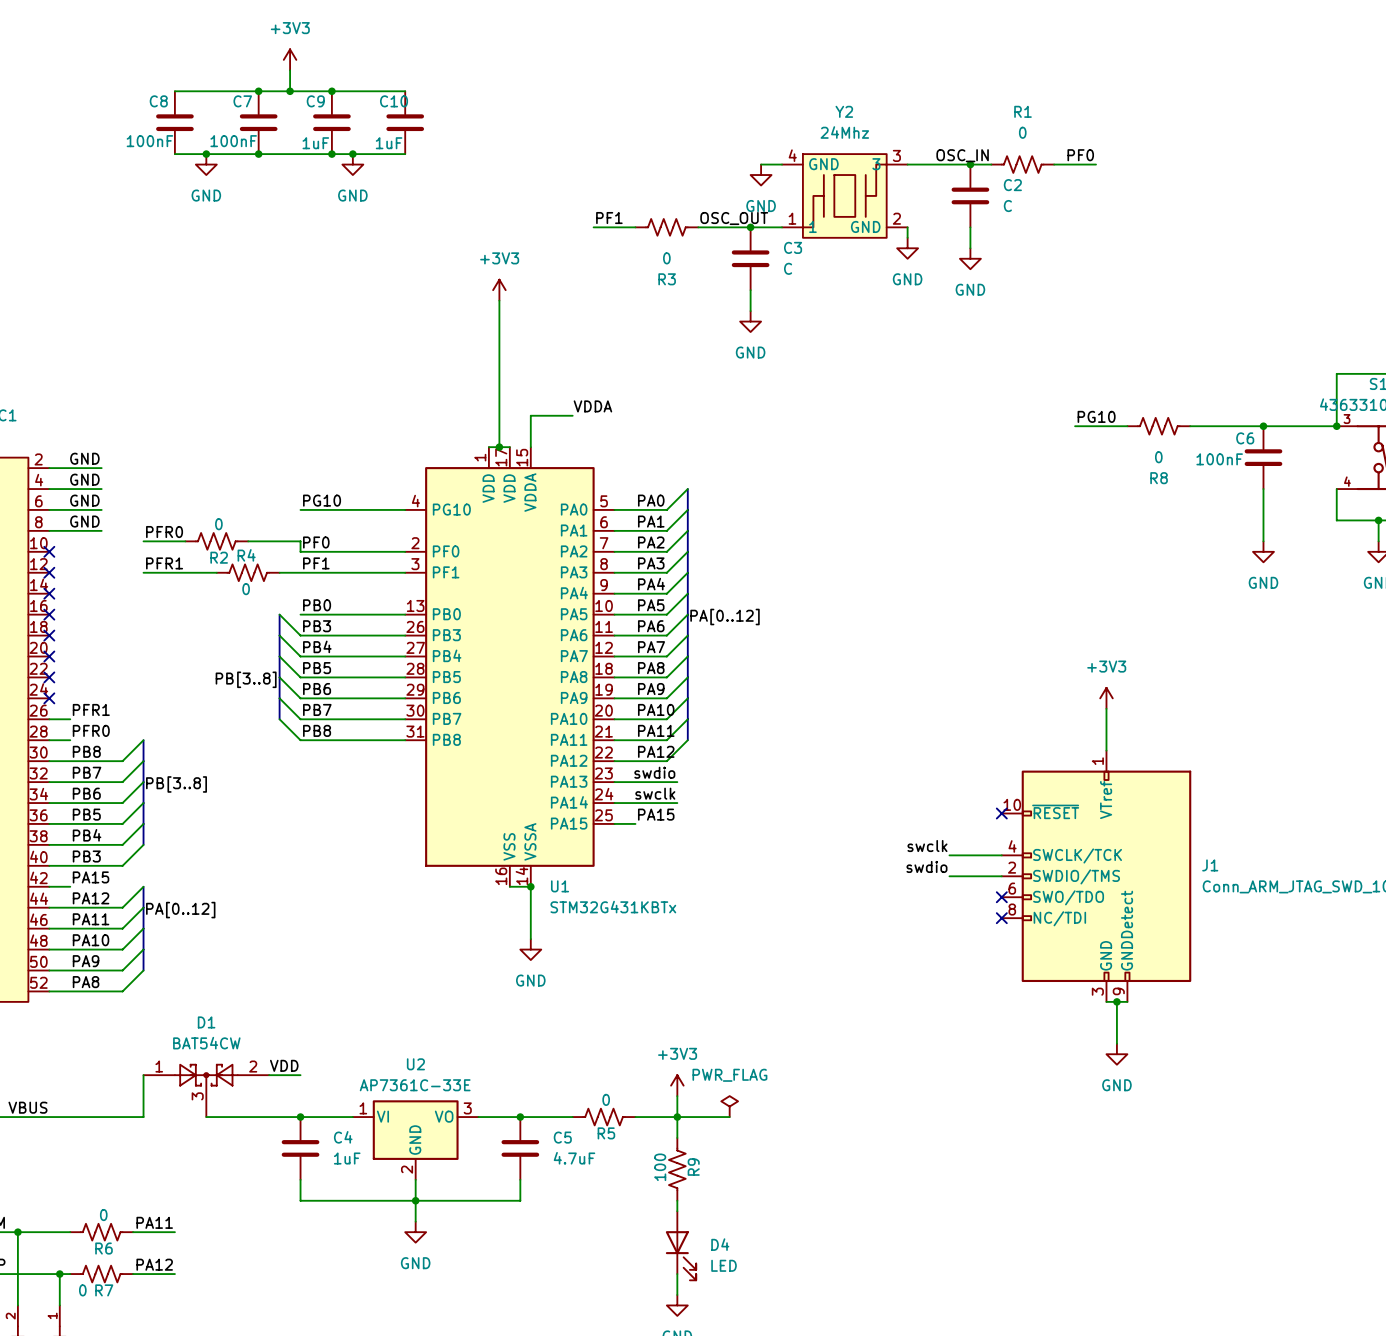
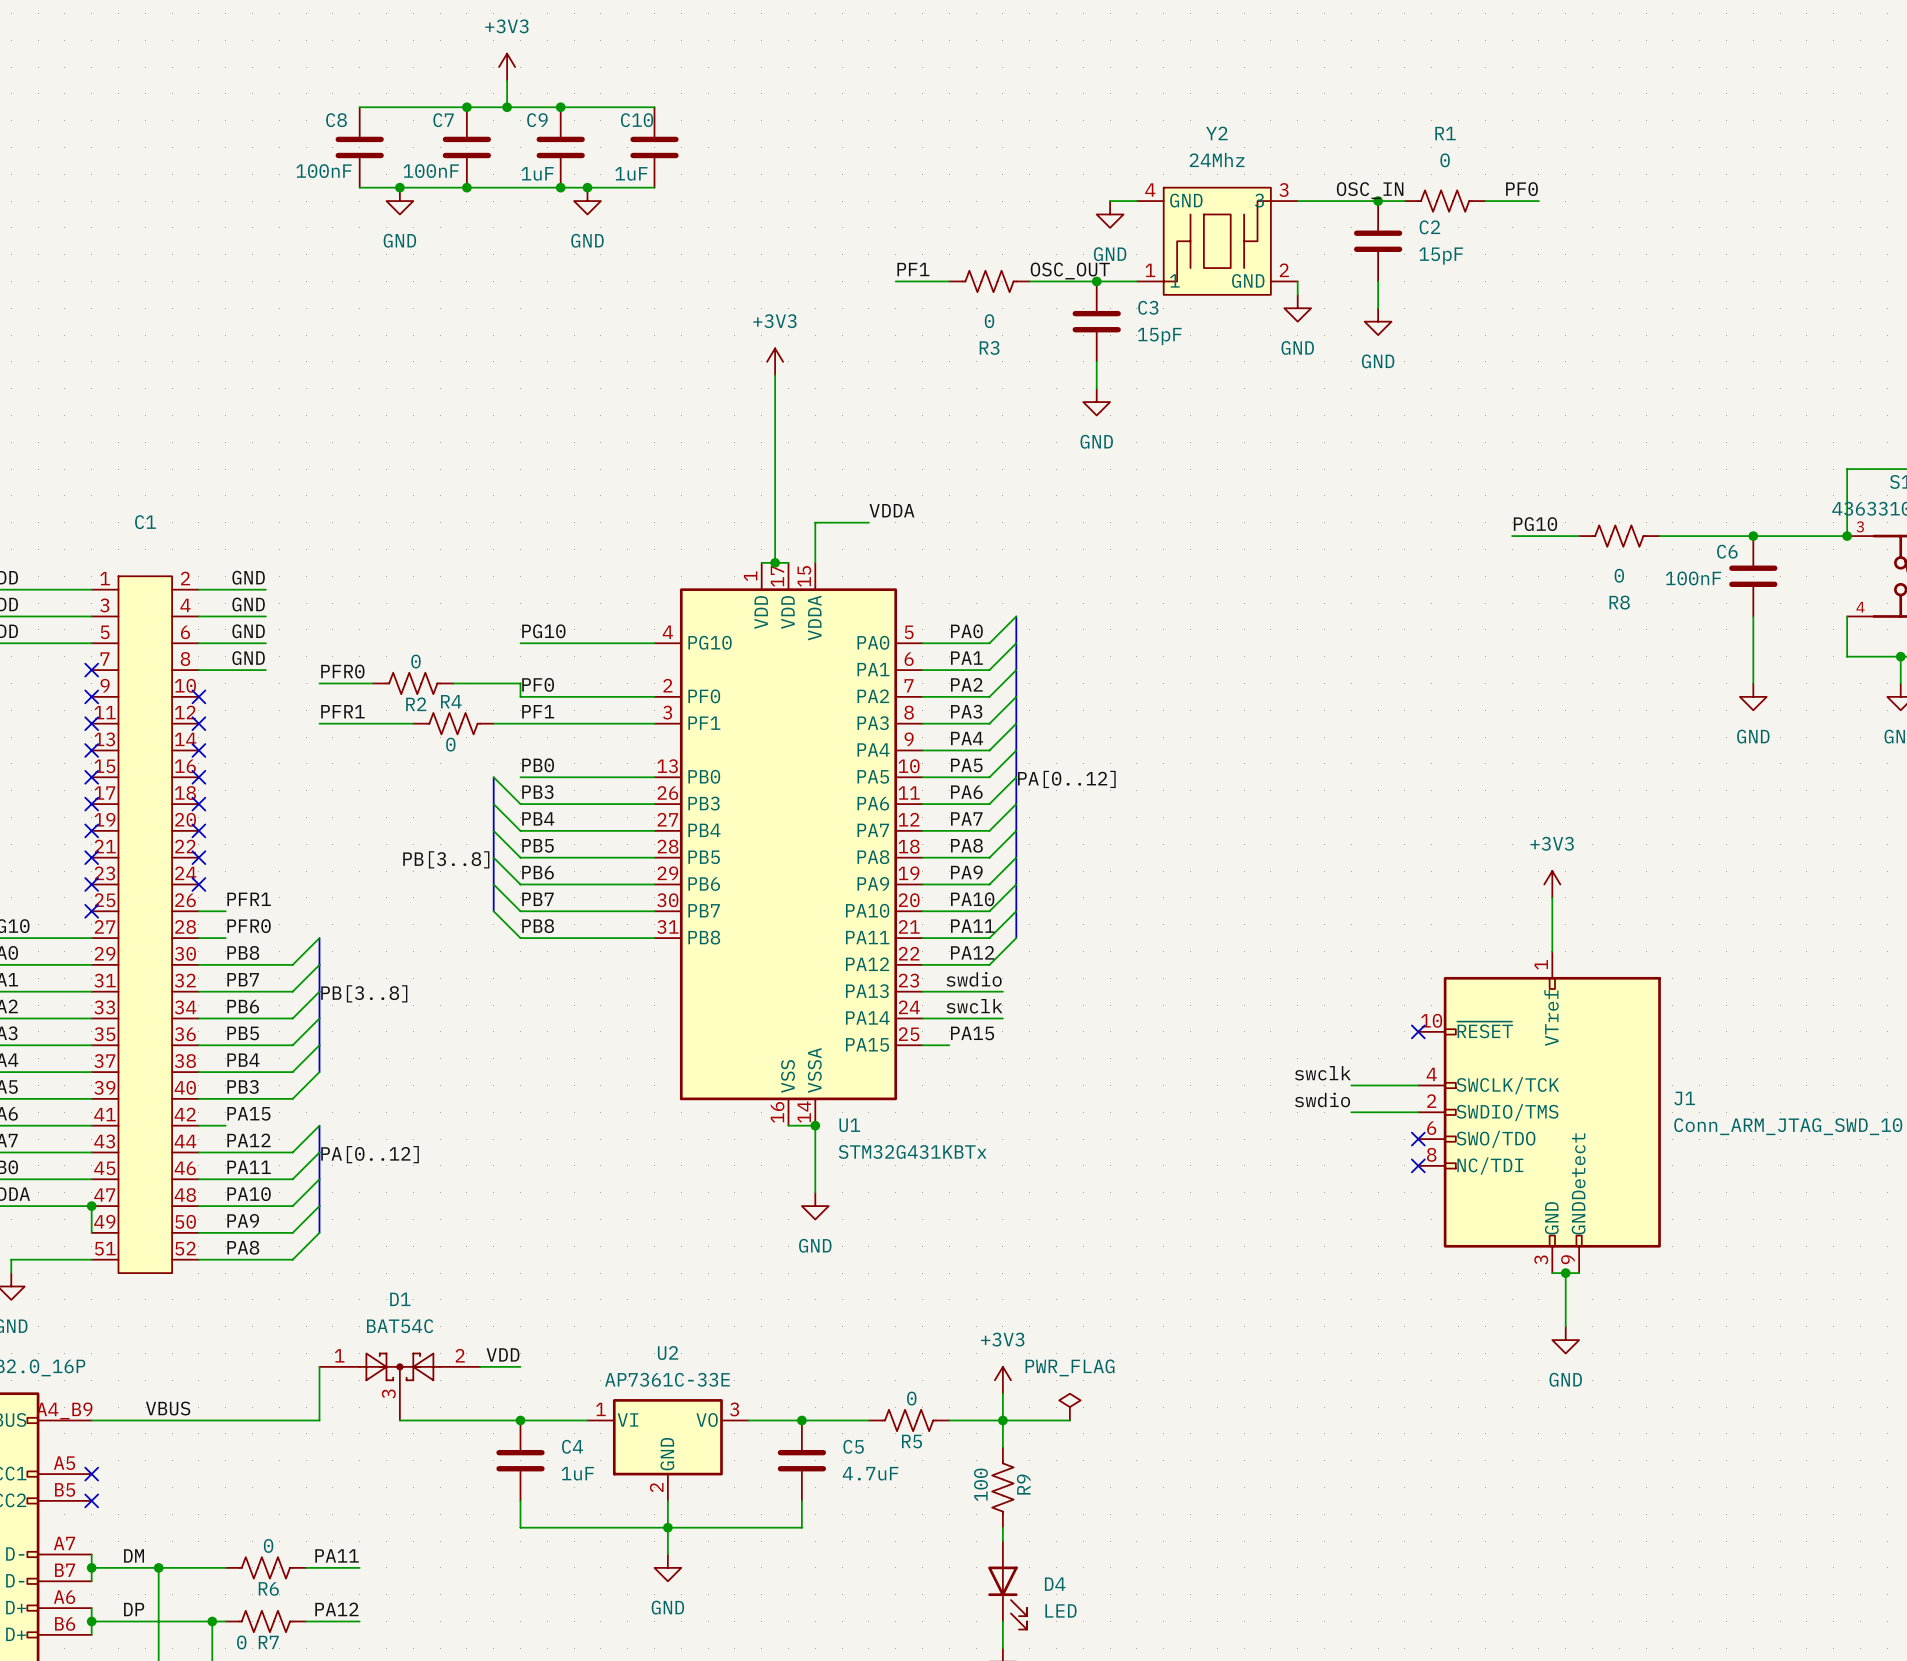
C2 value: C (1007, 206) -> 15pF (1441, 256)
C3 value: C (788, 268) -> 15pF (1159, 336)
D1 value: BAT54CW (206, 1043) -> BAT54C (400, 1326)

